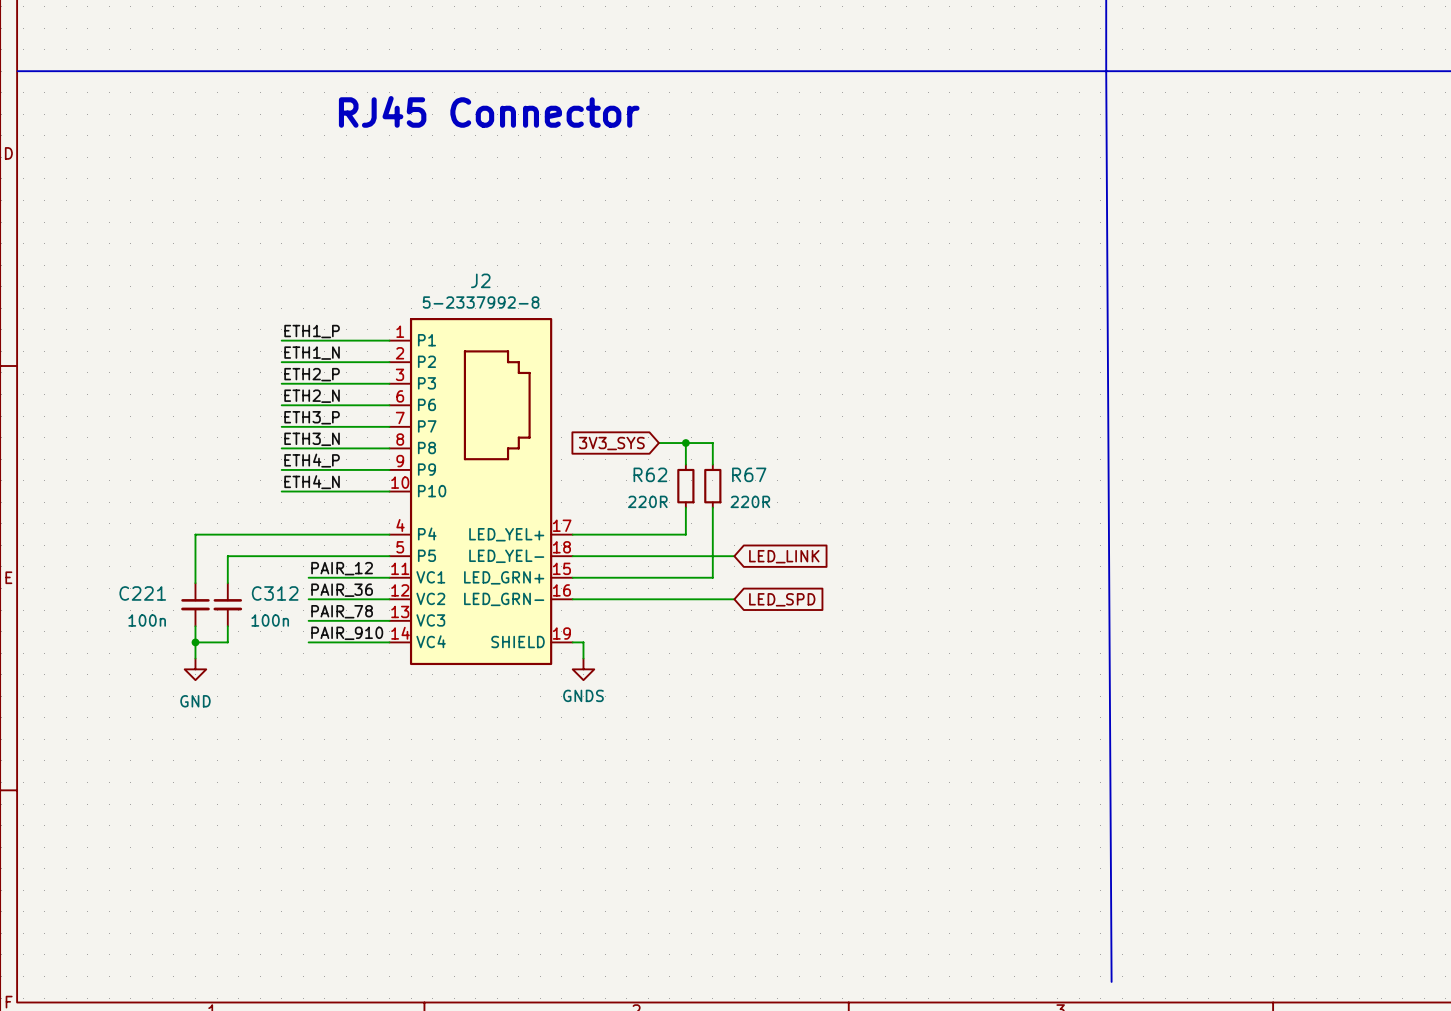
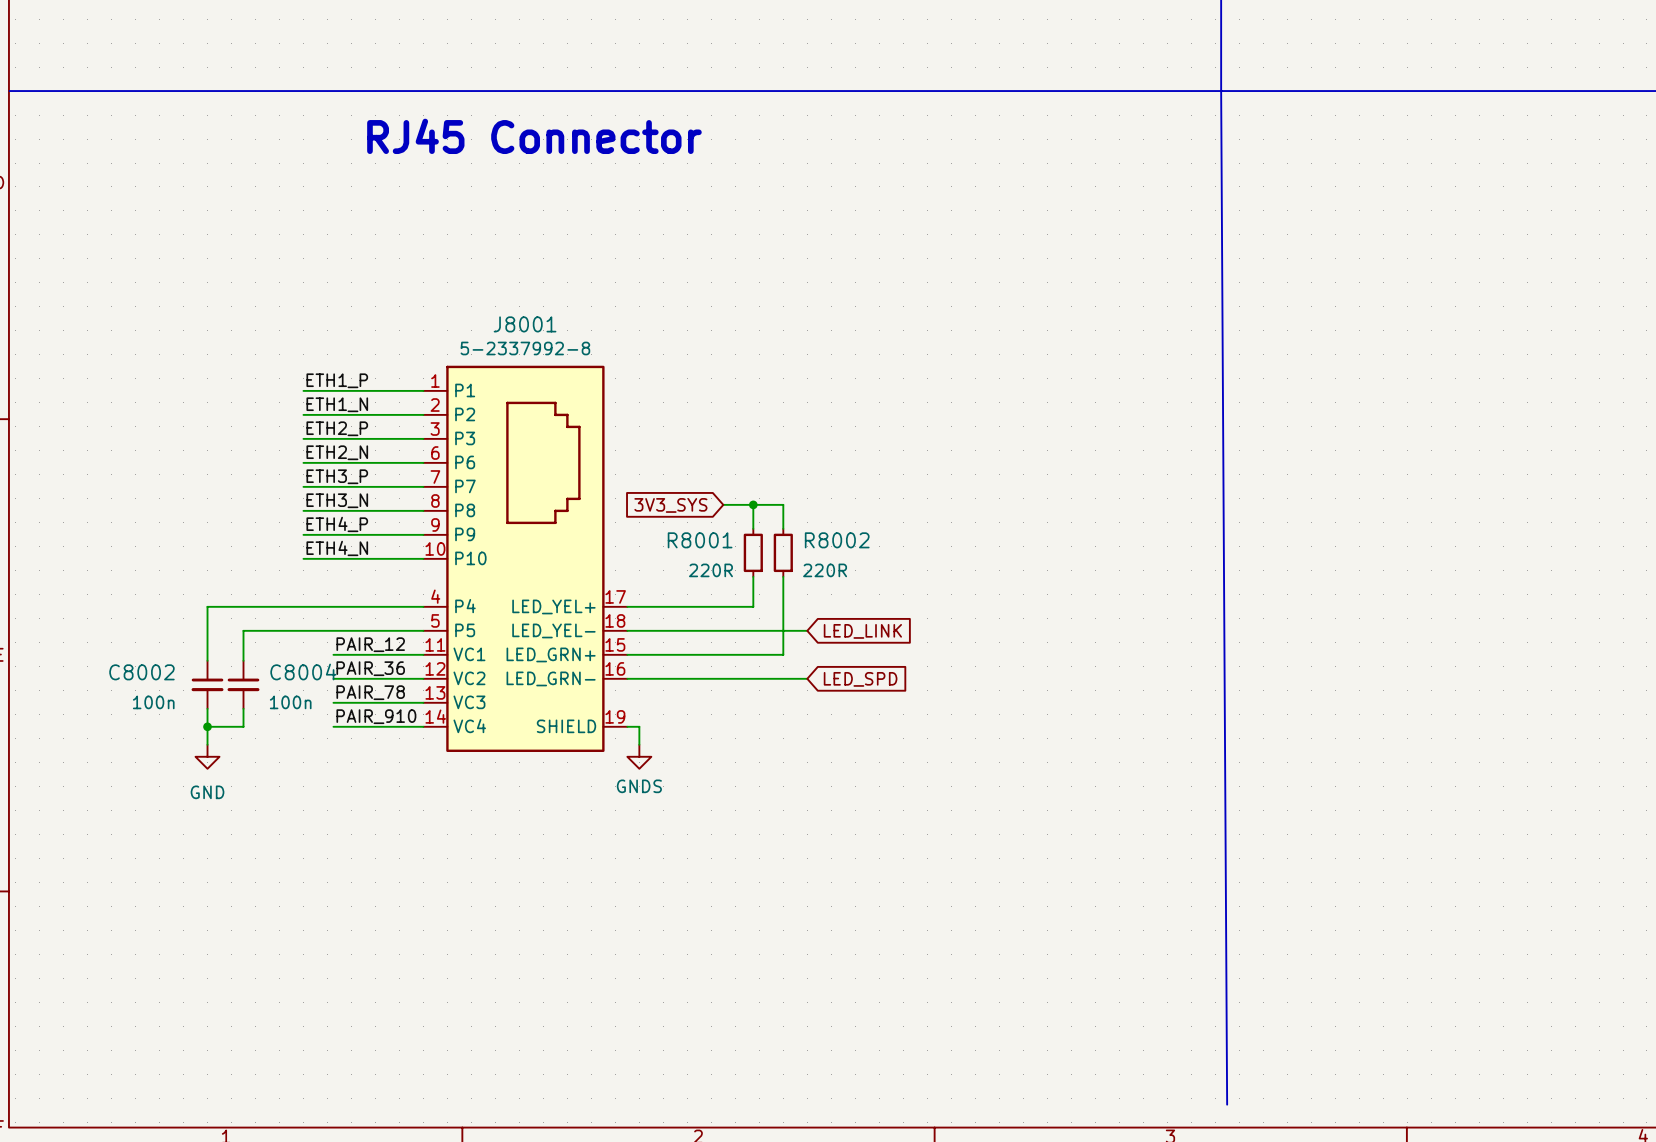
J2 name: J2 (480, 280) -> J8001 (525, 324)
R62 name: R62 (650, 474) -> R8001 (700, 540)
R67 name: R67 (749, 474) -> R8002 (837, 540)
C221 name: C221 (142, 593) -> C8002 (141, 672)
C312 name: C312 (275, 593) -> C8004 (303, 672)

